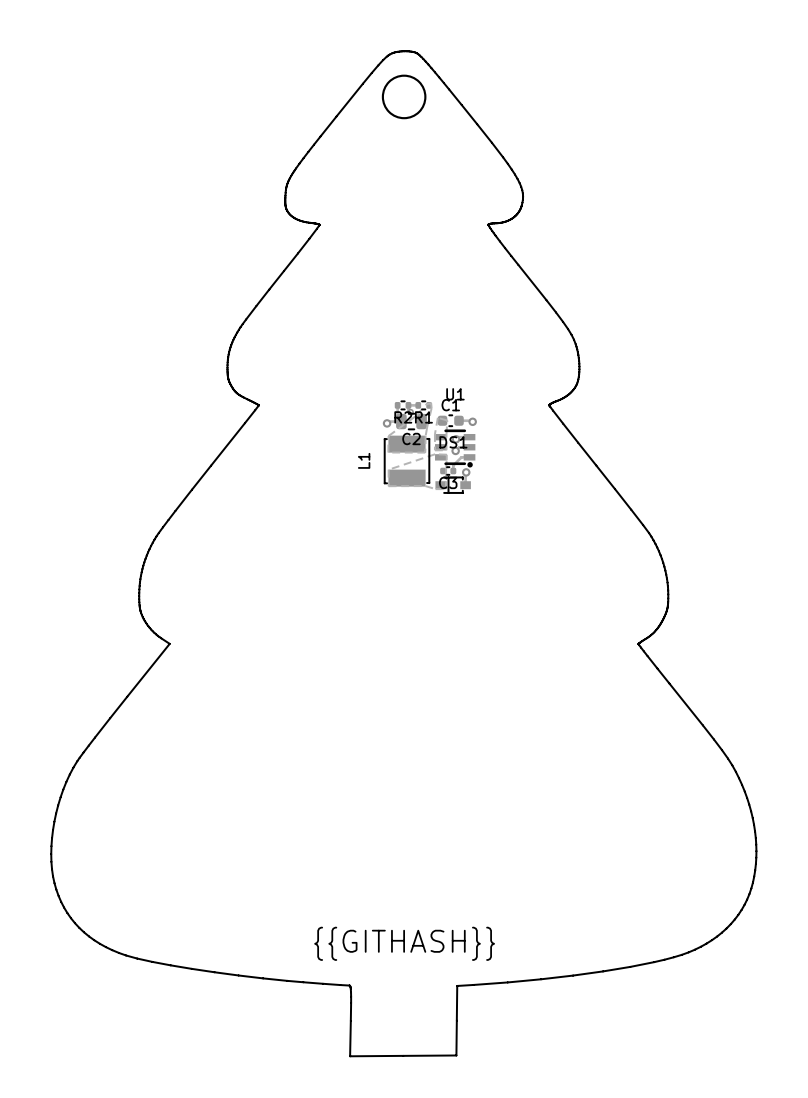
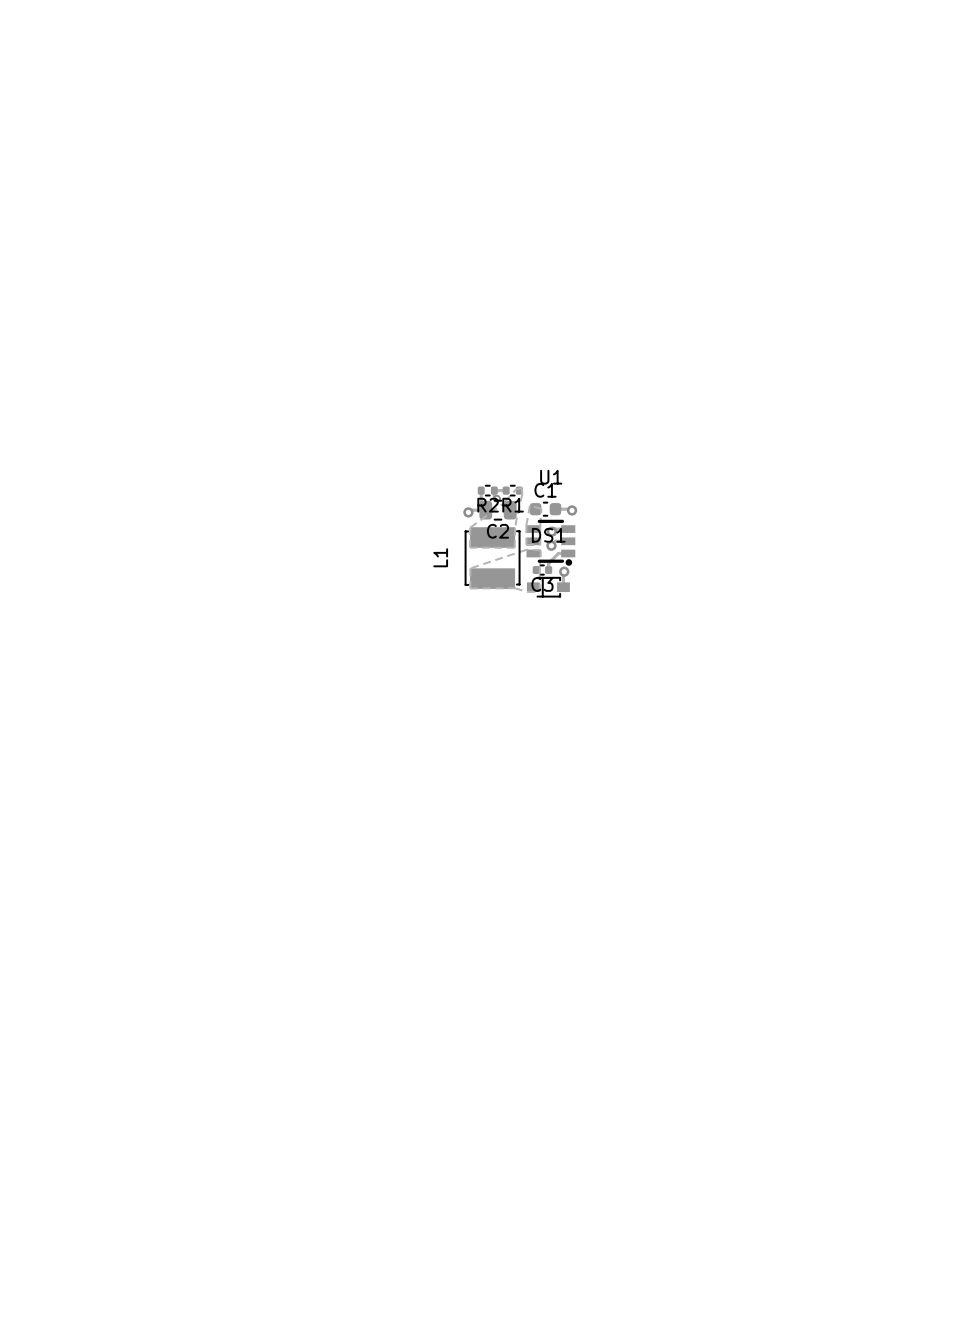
round board edge: [381, 74, 427, 120] -> none
board edge: (319, 224) (298, 219) (287, 211) (285, 197) (289, 179) (308, 151) (378, 65) (389, 54) (404, 51) (416, 53) (428, 64) (491, 142) (519, 183) (522, 199) (518, 212) (507, 220) (488, 224) -> none
board edge: (319, 224) (242, 324) (230, 347) (227, 367) (230, 383) (238, 394) (258, 405) -> none
board edge: (488, 224) (563, 321) (575, 344) (579, 363) (577, 383) (568, 394) (549, 405) -> none
board edge: (258, 405) (168, 519) (151, 545) (140, 575) (140, 609) (149, 627) (169, 643) (77, 761) (66, 781) (58, 805) (53, 829) (51, 854) (56, 889) (71, 918) (83, 932) (99, 943) (126, 955) (170, 965) (263, 978) (349, 985) (350, 1056) (456, 1055) (457, 985) (541, 979) (603, 971) (664, 959) (700, 946) (717, 936) (730, 924) (741, 909) (749, 894) (756, 857) (752, 818) (742, 784) (728, 758) (638, 644) -> none
board edge: (549, 405) (643, 525) (660, 555) (667, 582) (667, 609) (656, 630) (638, 643) -> none
text: {{GITHASH}} (404, 943) -> none

